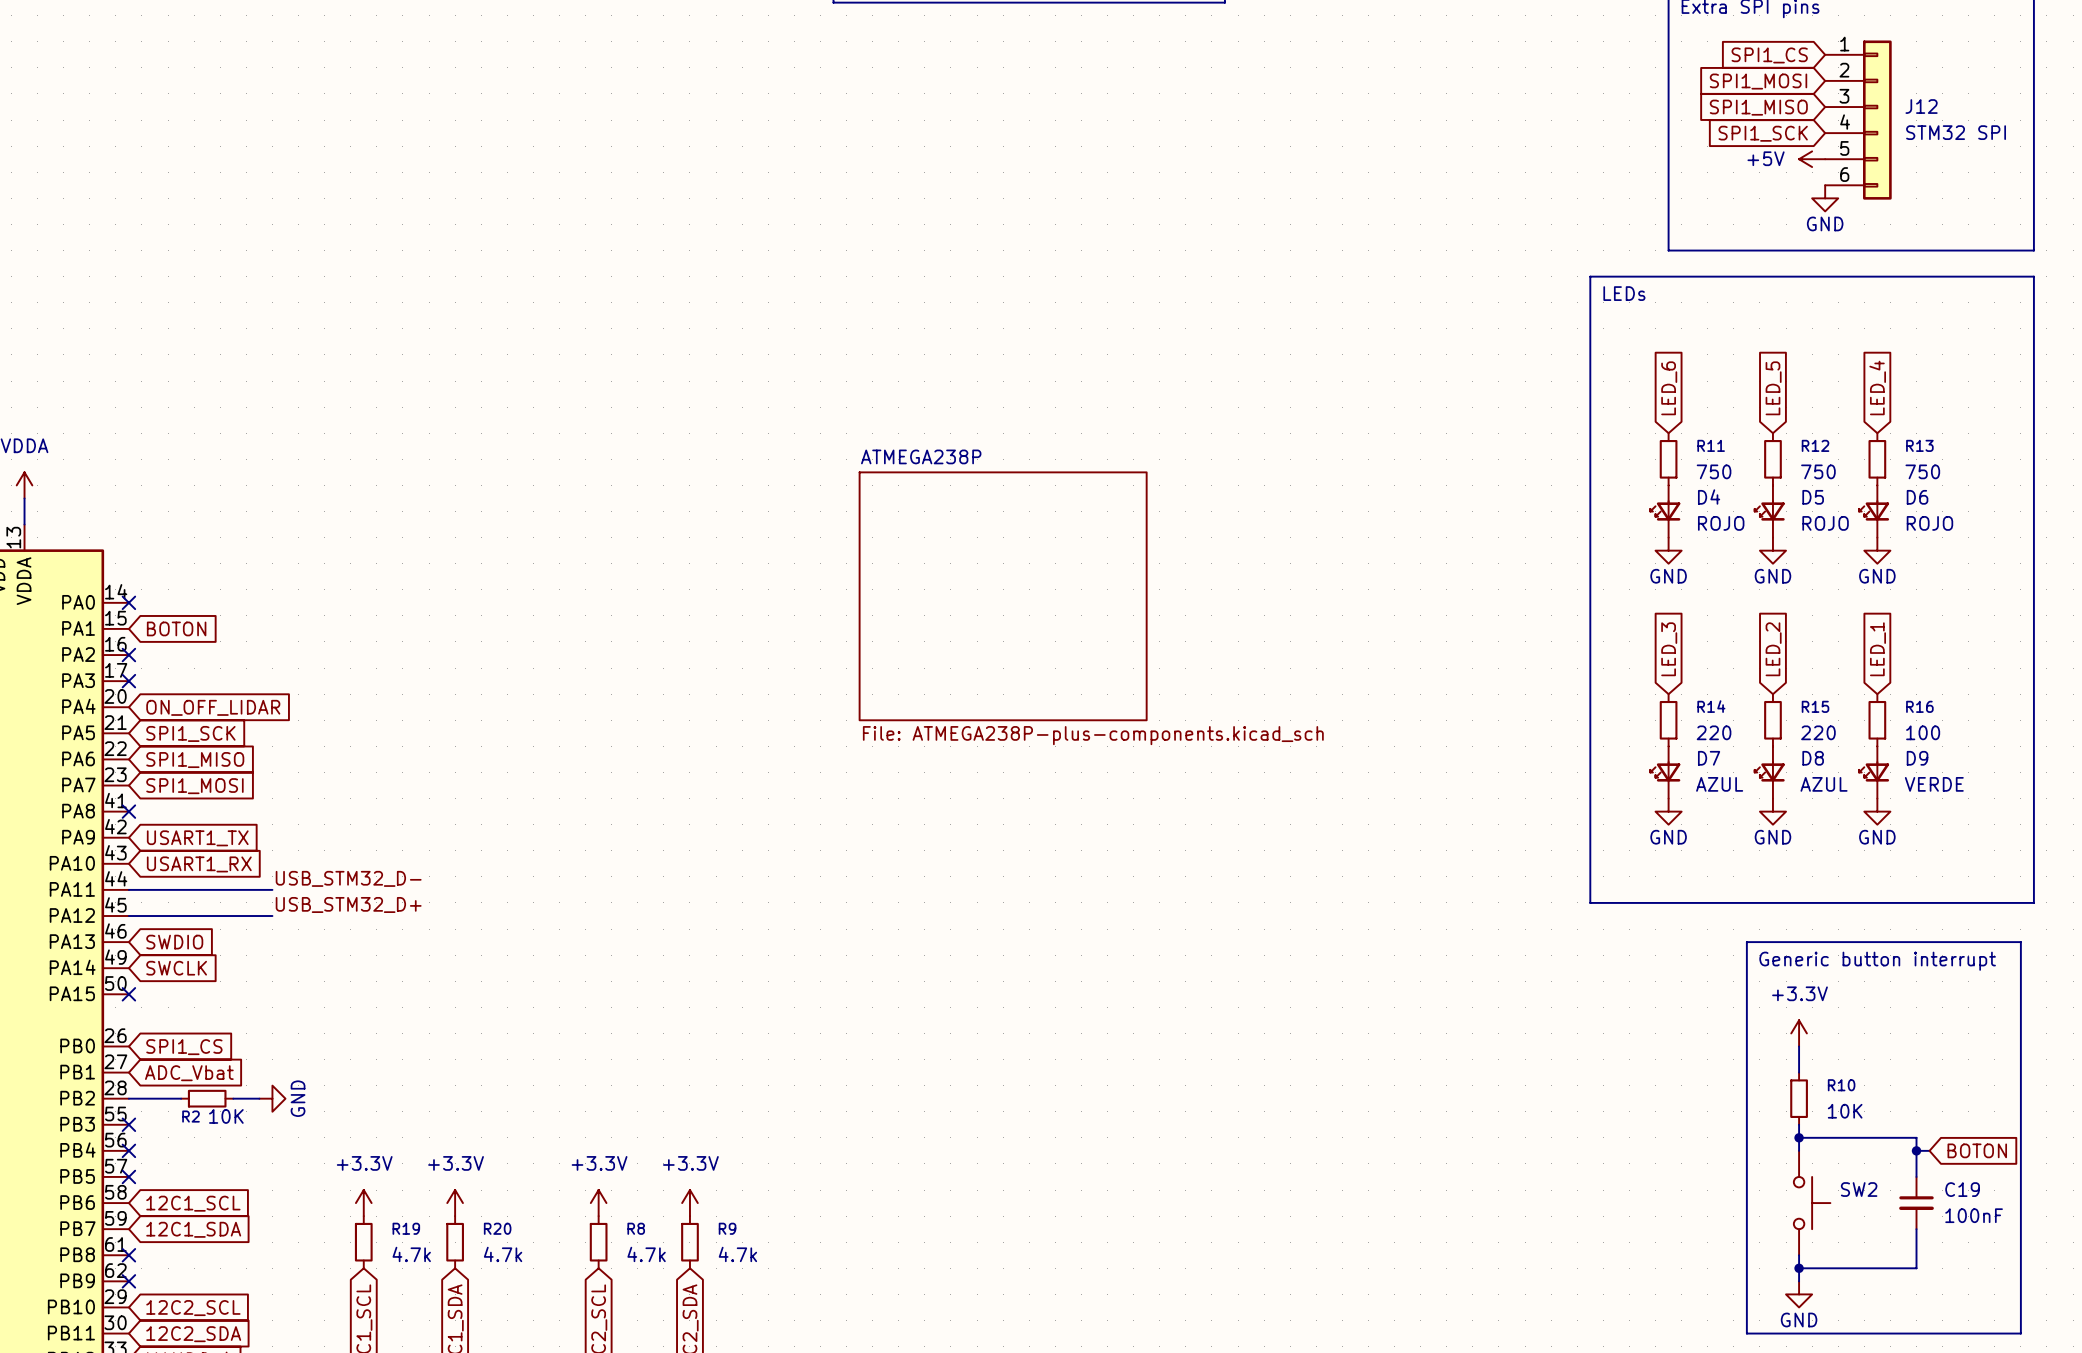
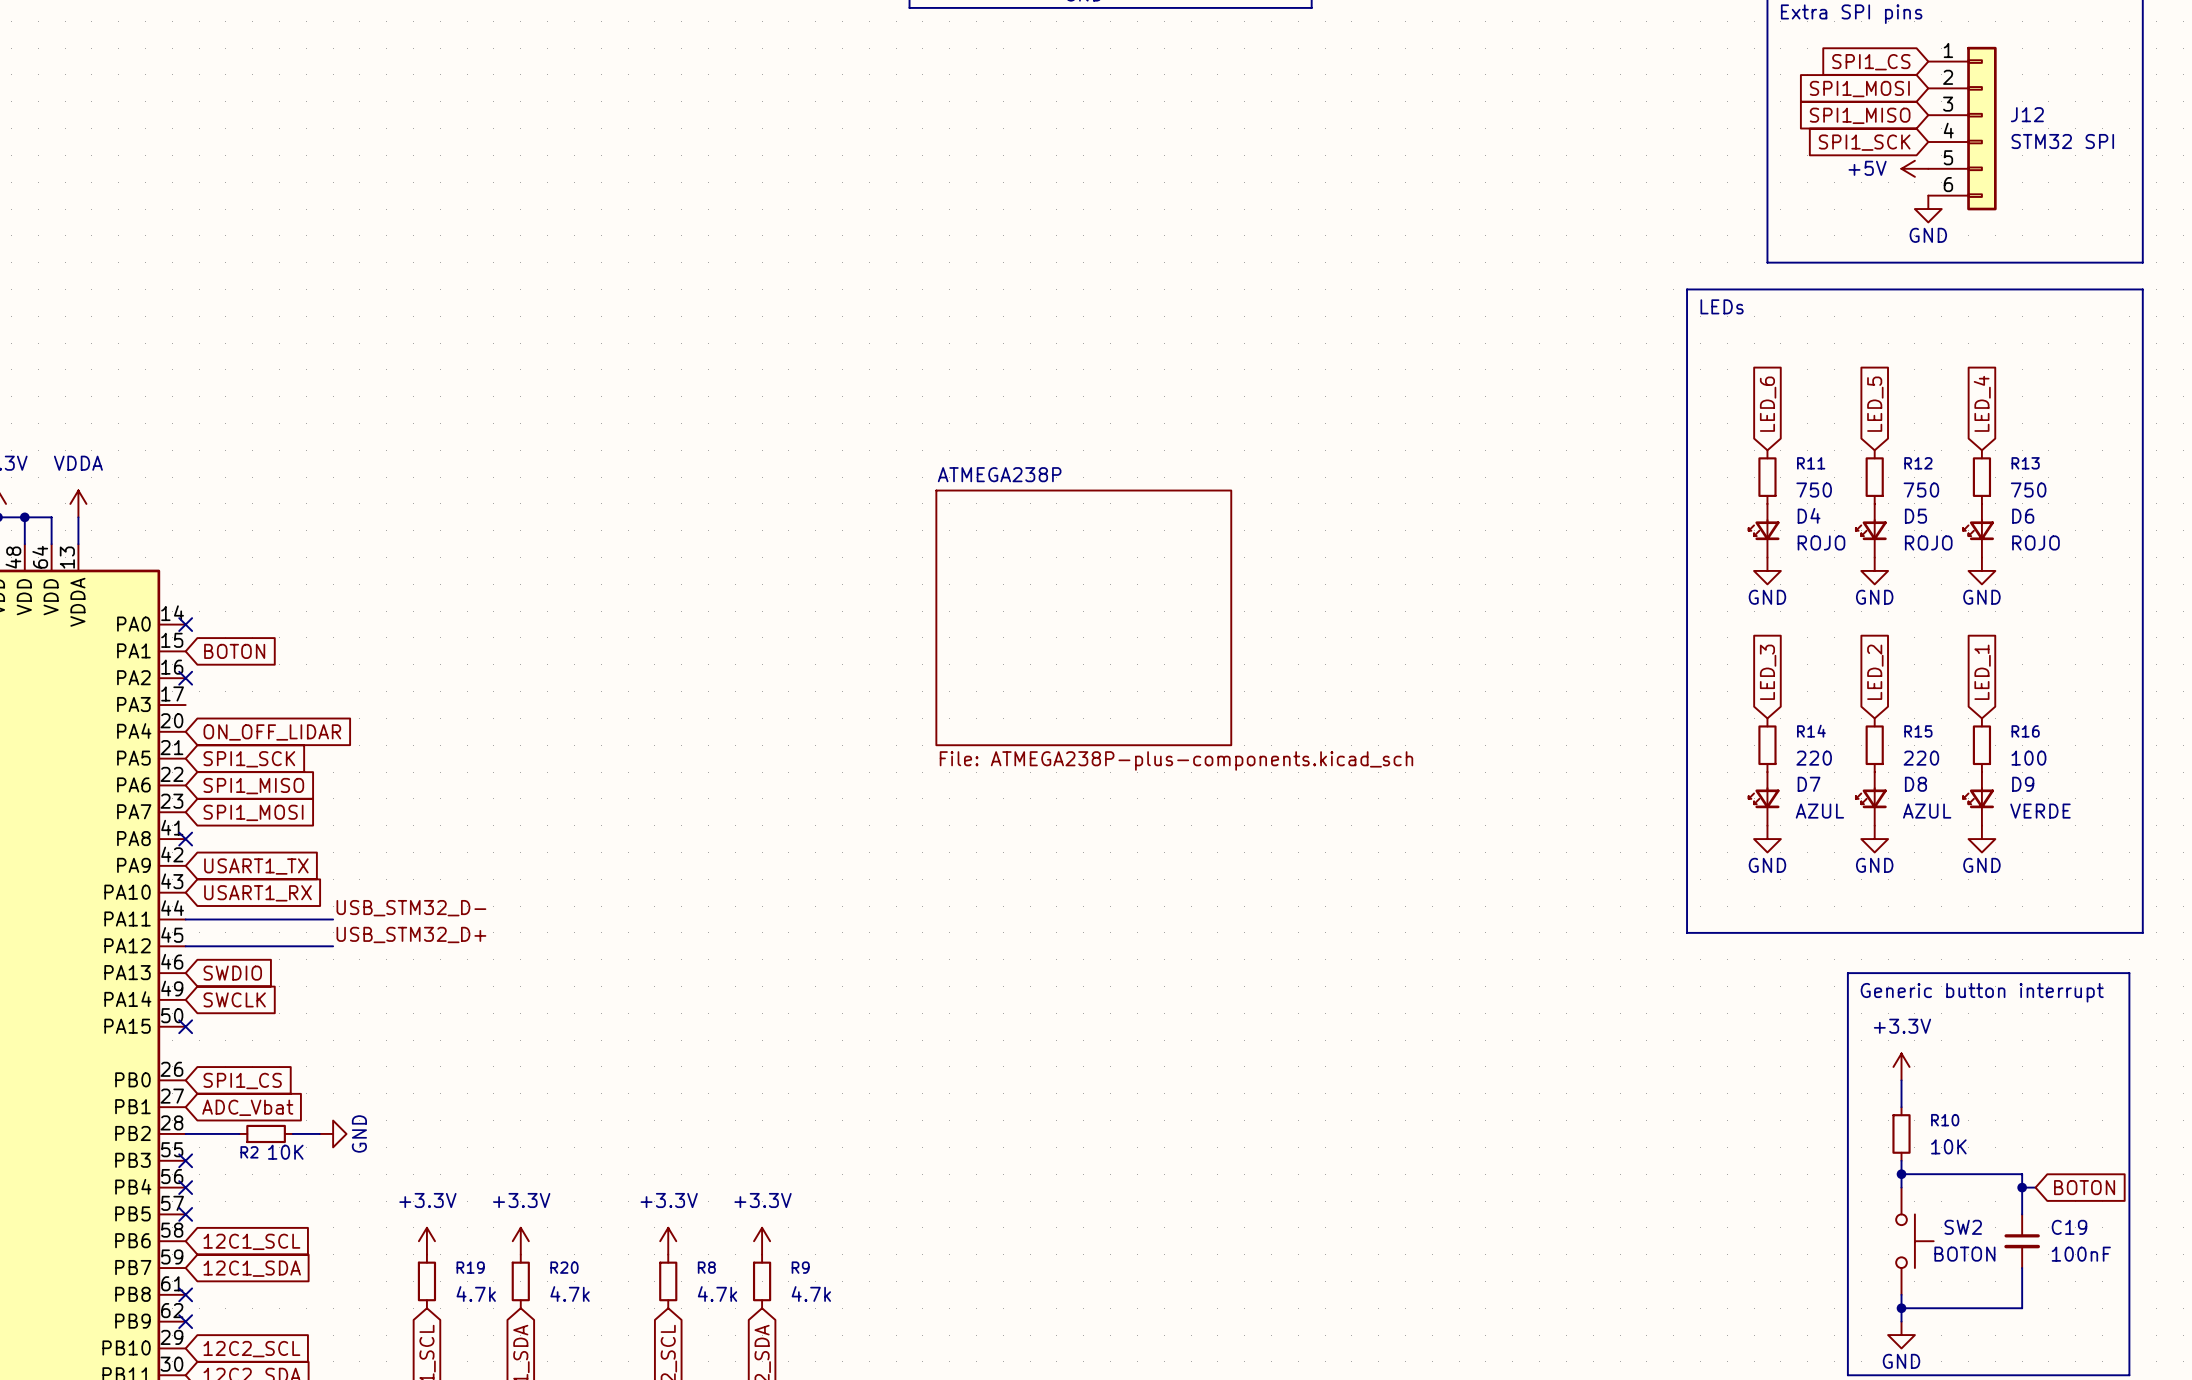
no-connect mark: (128, 681) -> none
SW2 value: none -> BOTON (1964, 1254)

